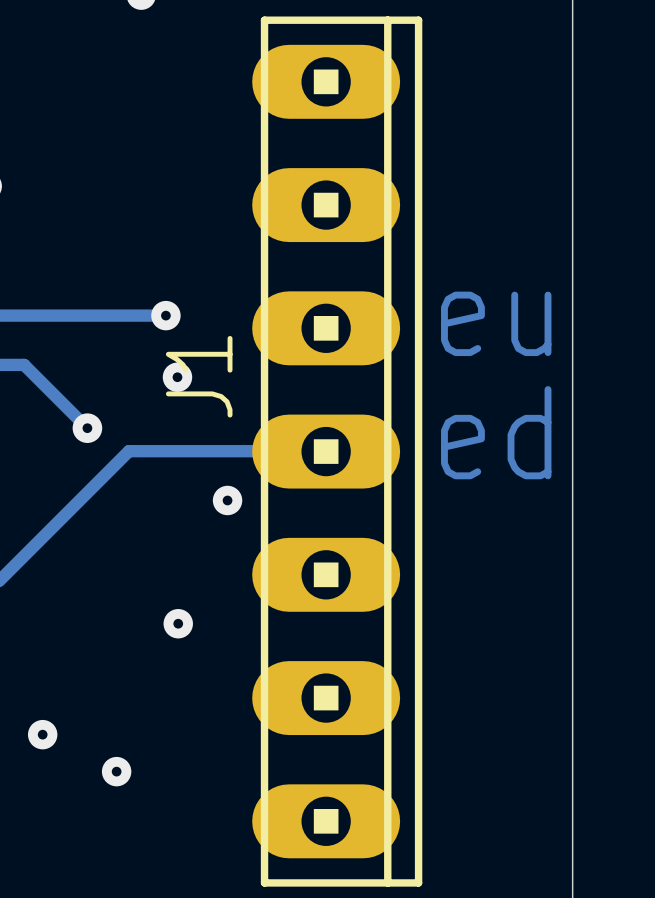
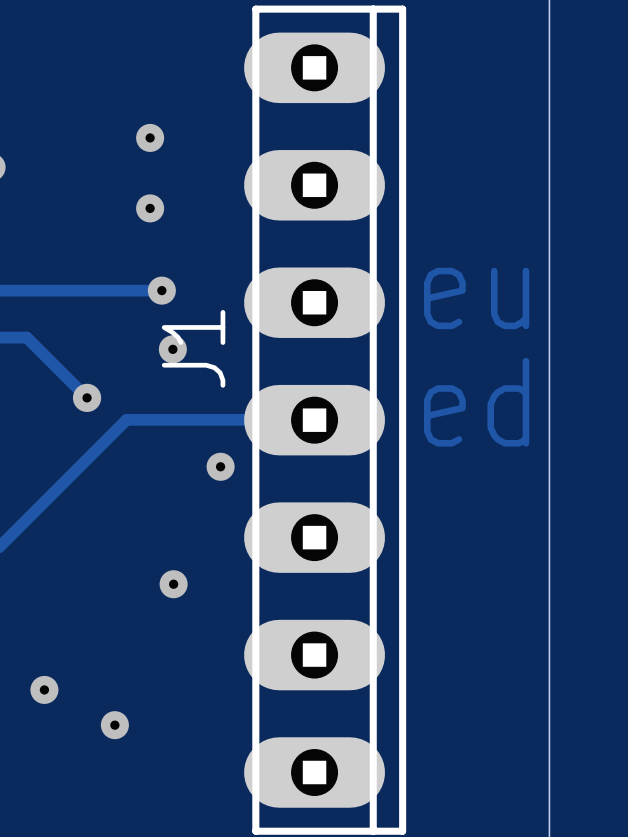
via: none -> (150, 137)
via: none -> (150, 208)

